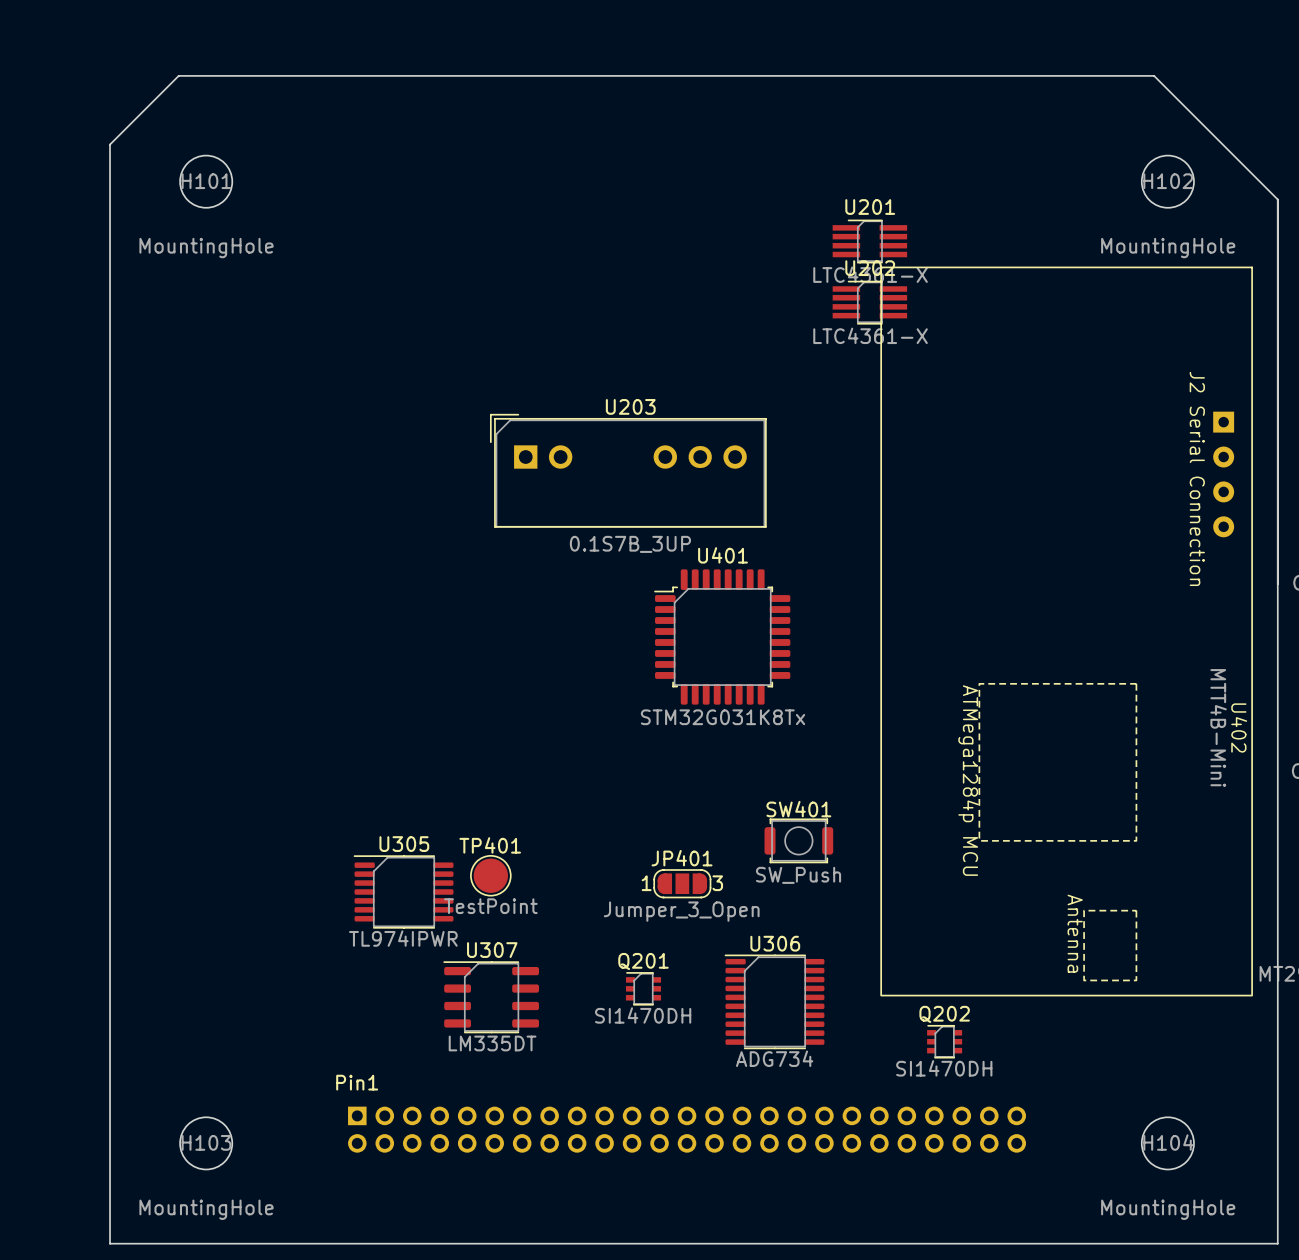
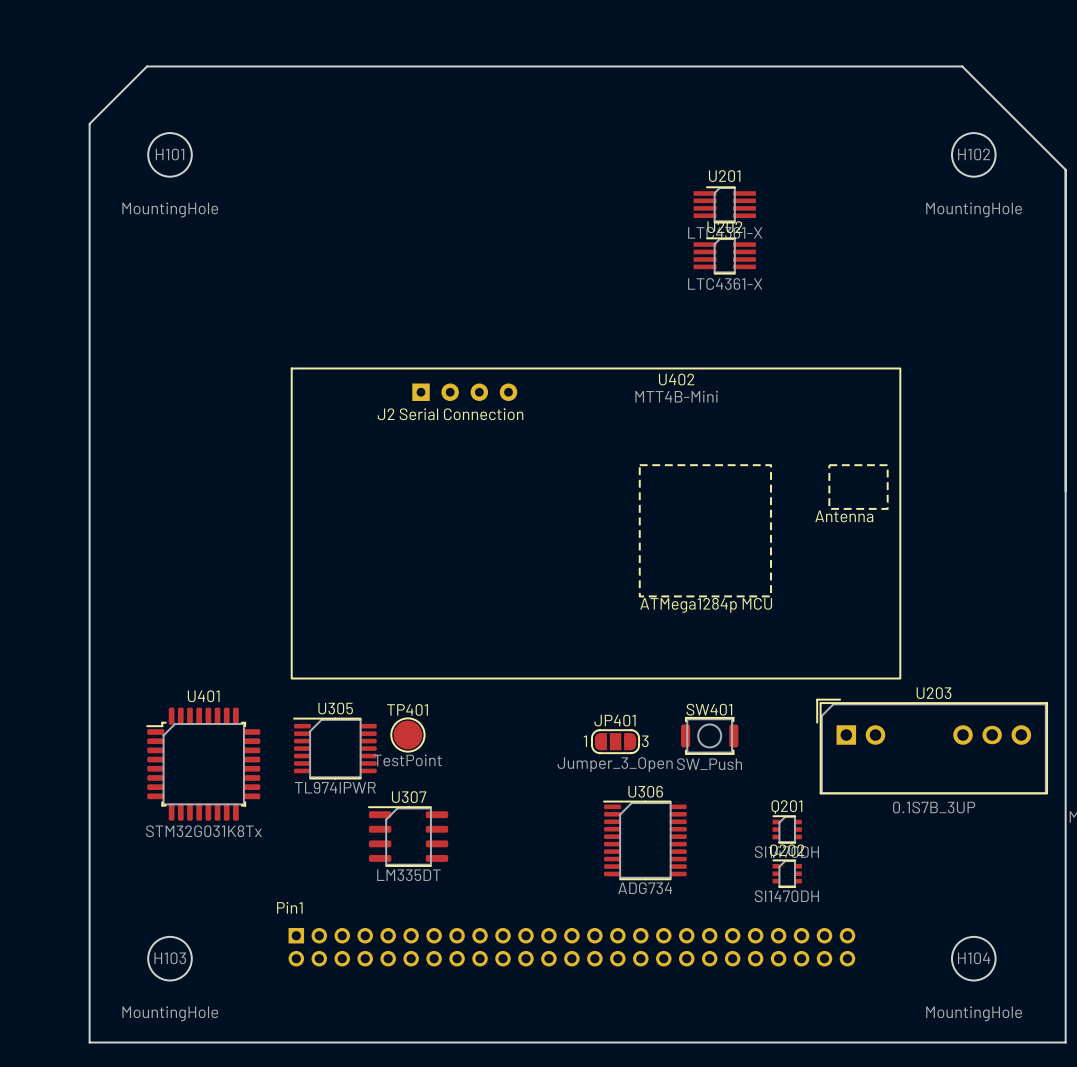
U203 position: (628, 470) -> (932, 746)
U402 rotation: 0° (1066, 631) -> 90° counterclockwise (596, 523)
U401 position: (722, 636) -> (203, 764)
SW401 position: (798, 840) -> (709, 735)
JP401 position: (682, 883) -> (615, 741)
Q201 position: (643, 988) -> (787, 829)

